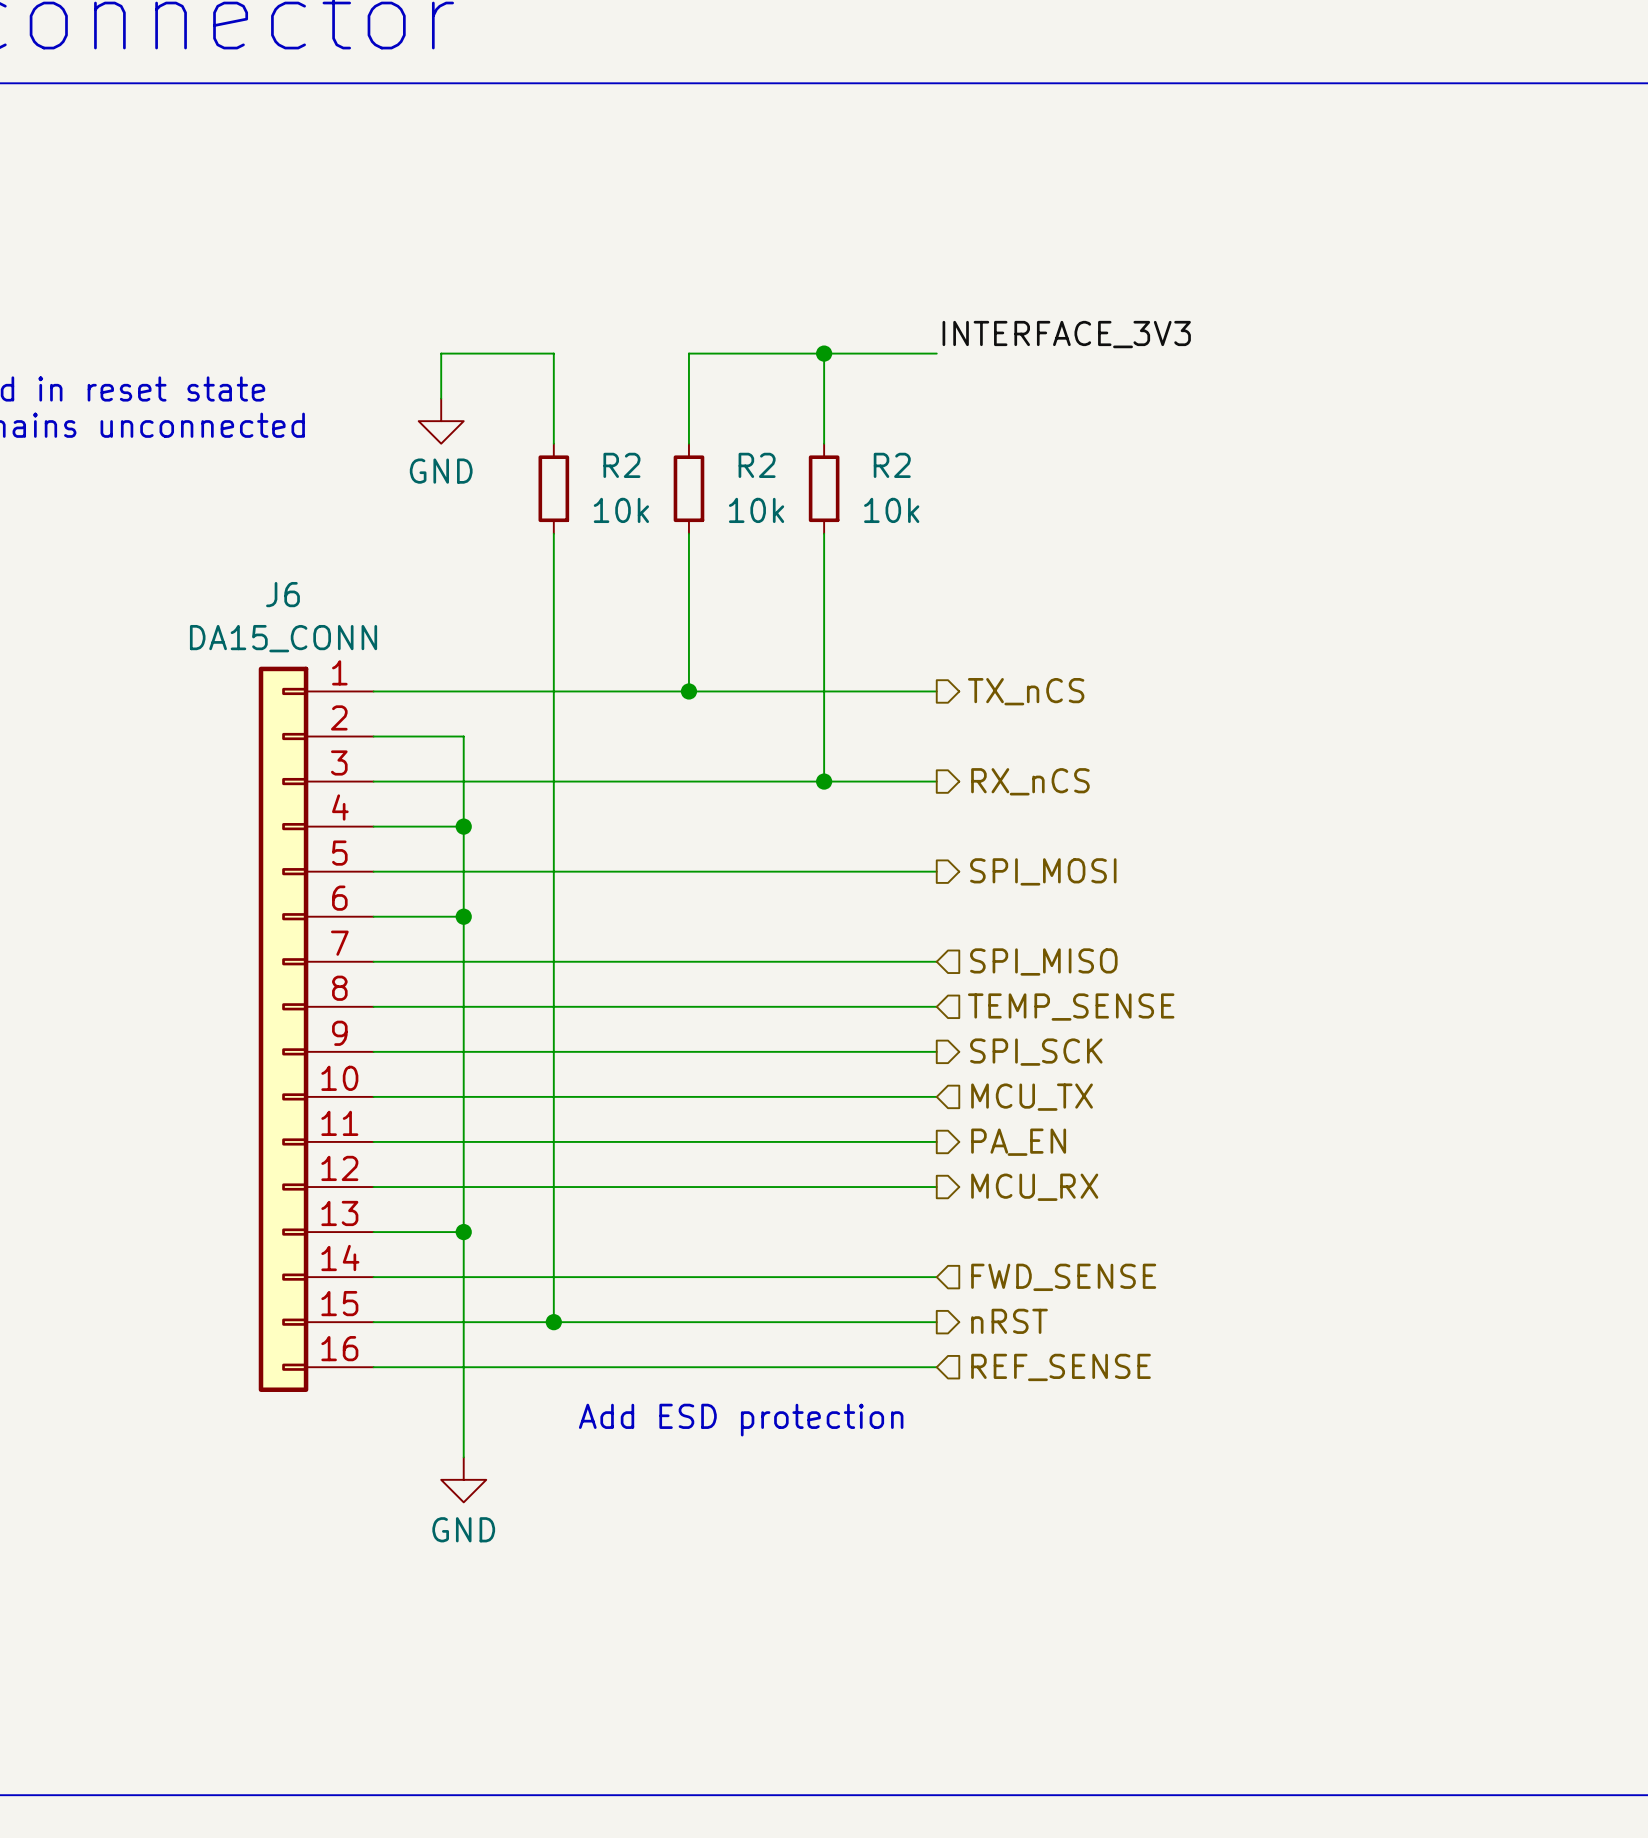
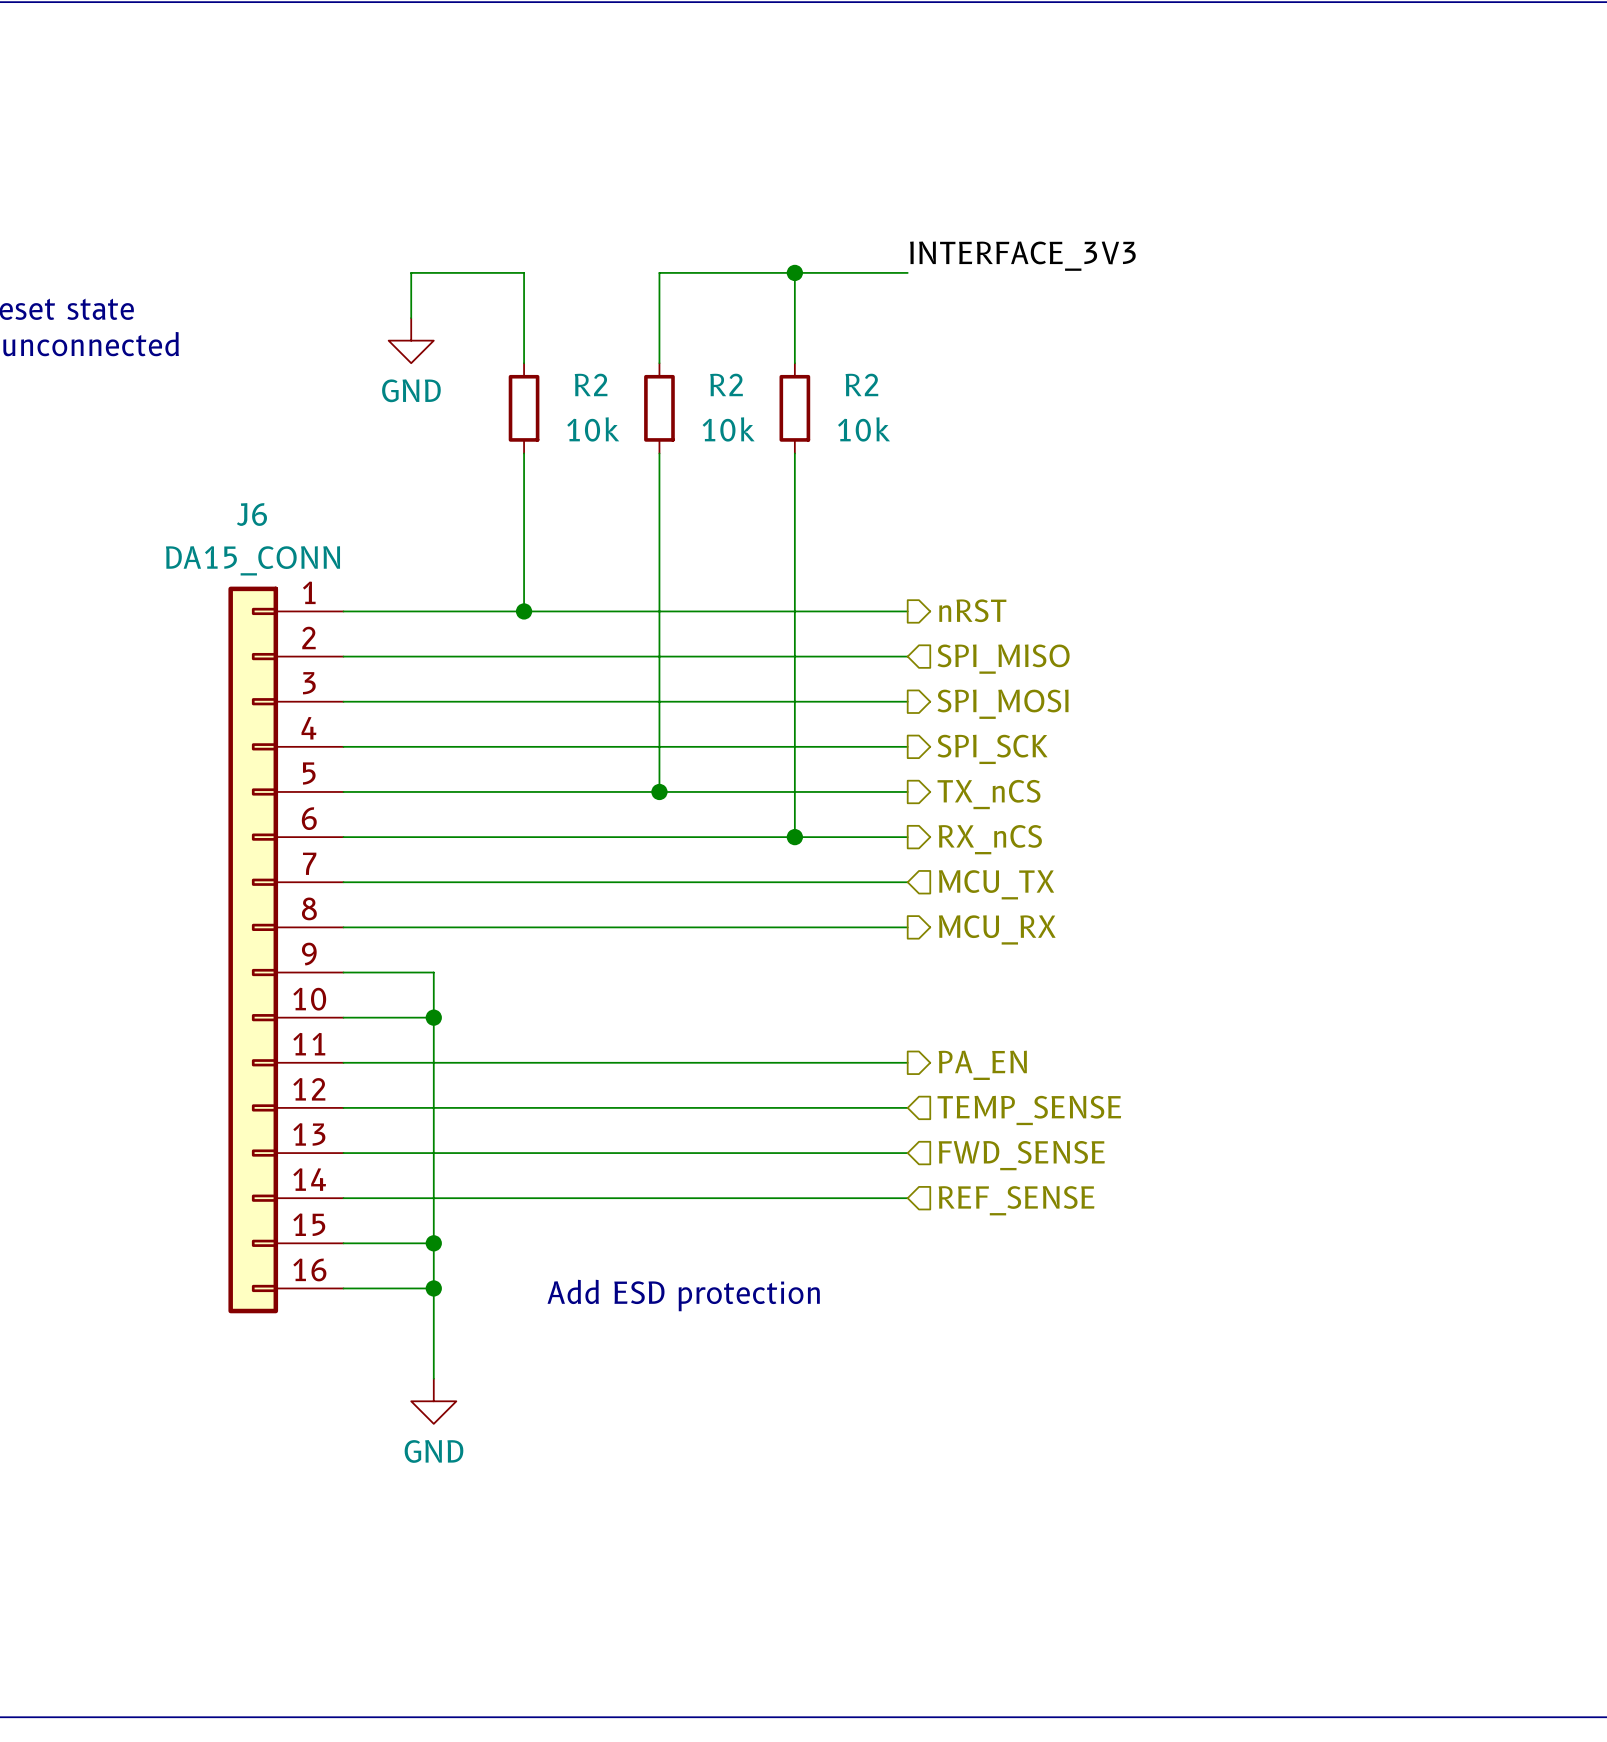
wire: (553, 691) (553, 1322) -> none
junction: none -> (524, 611)
wire: none -> (659, 611) (659, 791)
junction: (688, 691) -> none
hierarchical label: TX_nCS (1026, 691) -> nRST (972, 610)
wire: (463, 736) (463, 1051) (936, 1051) -> (433, 656) (907, 656)
hierarchical label: none -> SPI_MISO (1003, 659)
wire: none -> (794, 701) (794, 837)
junction: (824, 781) -> none
hierarchical label: RX_nCS (1030, 781) -> SPI_MOSI (1003, 704)
wire: none -> (433, 746) (907, 746)
junction: (463, 826) -> none
junction: none -> (659, 791)
hierarchical label: SPI_MOSI (1043, 871) -> TX_nCS (988, 794)
junction: (463, 916) -> none
junction: none -> (794, 837)
hierarchical label: none -> RX_nCS (990, 839)
hierarchical label: SPI_MISO (1043, 961) -> MCU_TX (996, 884)
hierarchical label shape: input (1071, 1007) -> output (997, 929)
hierarchical label: TEMP_SENSE (1071, 1007) -> MCU_RX (997, 929)
hierarchical label position: SPI_SCK (1036, 1052) -> SPI_SCK (992, 749)
wire: (463, 1096) (936, 1096) -> (433, 837) (907, 837)
junction: none -> (433, 1017)
hierarchical label: MCU_TX (1032, 1097) -> none
hierarchical label shape: output (1034, 1187) -> input (1029, 1110)
hierarchical label: MCU_RX (1034, 1187) -> TEMP_SENSE (1029, 1110)
junction: (463, 1232) -> none
hierarchical label: none -> FWD_SENSE (1021, 1155)
hierarchical label: FWD_SENSE (1063, 1277) -> REF_SENSE (1016, 1200)
hierarchical label: nRST (1009, 1321) -> none
wire: (463, 1322) (936, 1322) -> (433, 1153) (907, 1153)
junction: none -> (433, 1243)
junction: (553, 1322) -> none
wire: (463, 1367) (936, 1367) -> none
junction: none -> (433, 1288)
hierarchical label: REF_SENSE (1060, 1367) -> none
text position: Add ESD protection (741, 1420) -> Add ESD protection (683, 1295)

